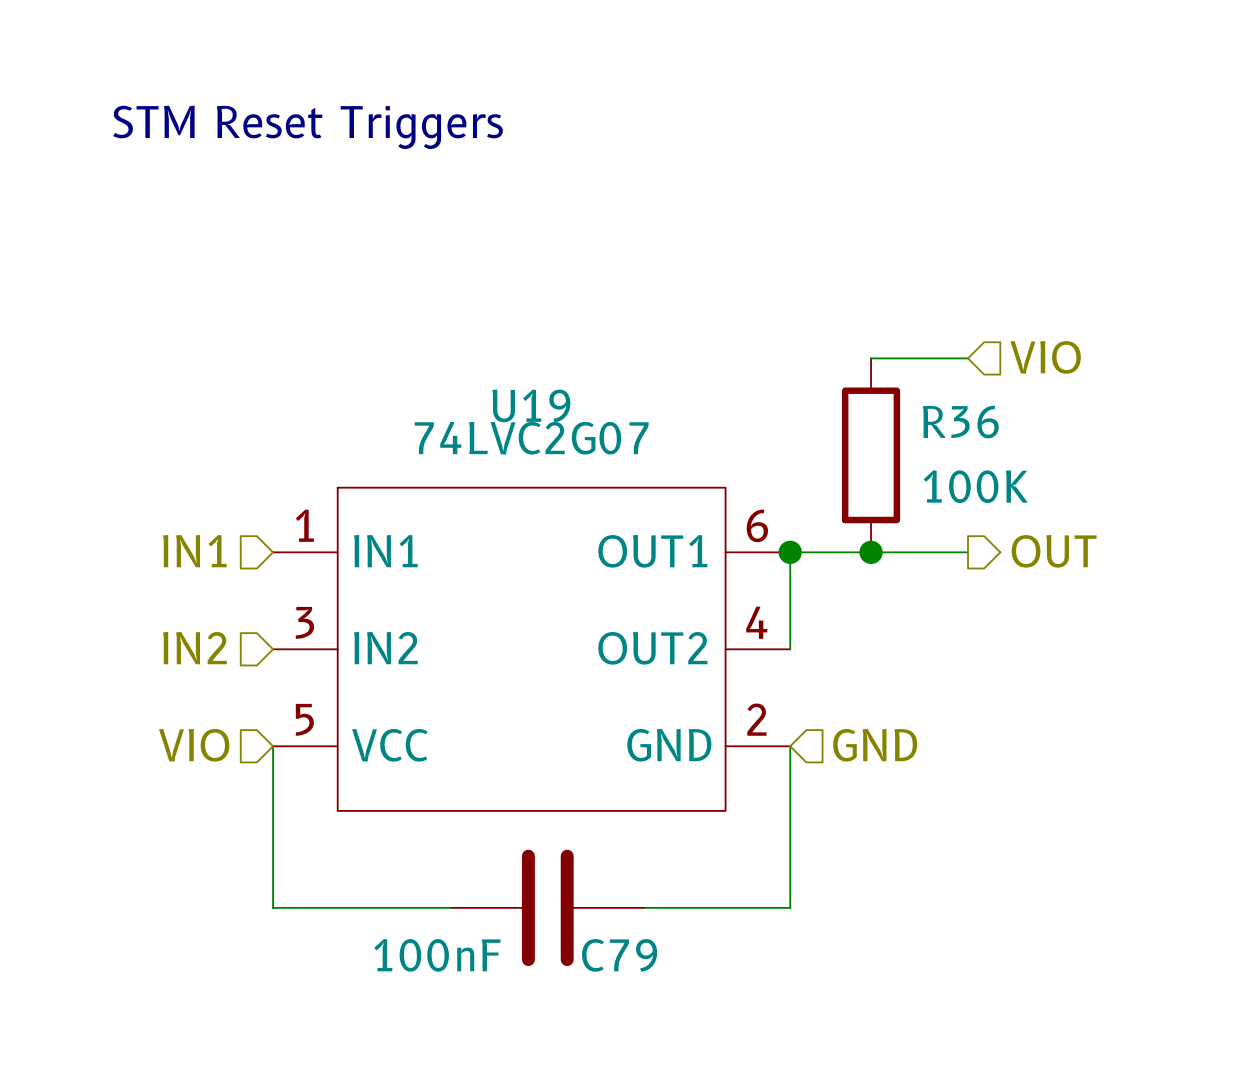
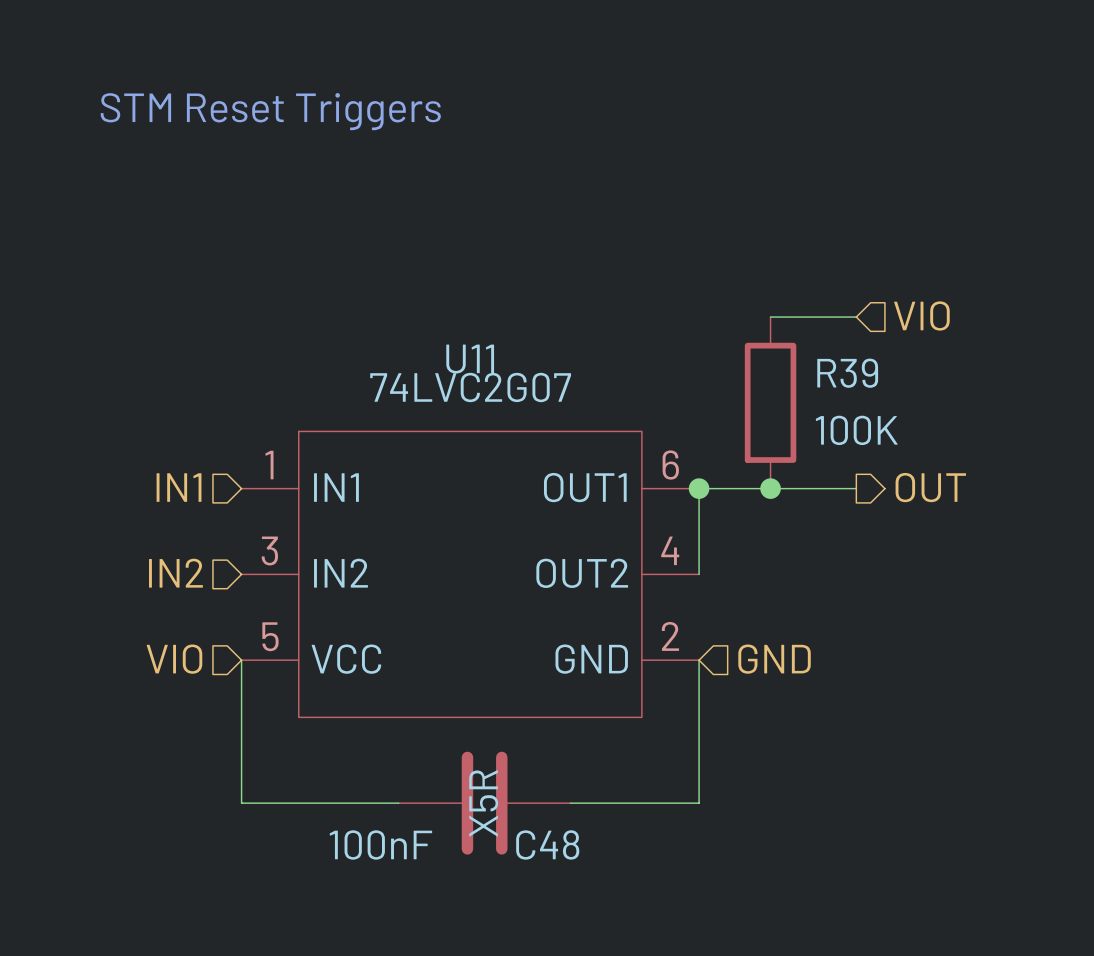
U19 name: U19 (531, 405) -> U11 (470, 359)
R36 name: R36 (960, 422) -> R39 (847, 373)
C79 text: none -> X5R (483, 803)
C79 name: C79 (619, 955) -> C48 (547, 844)

